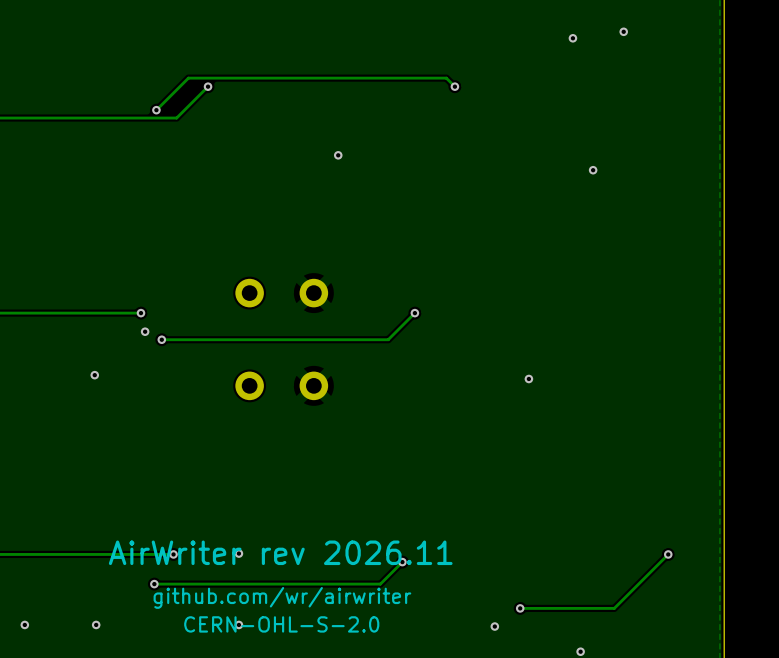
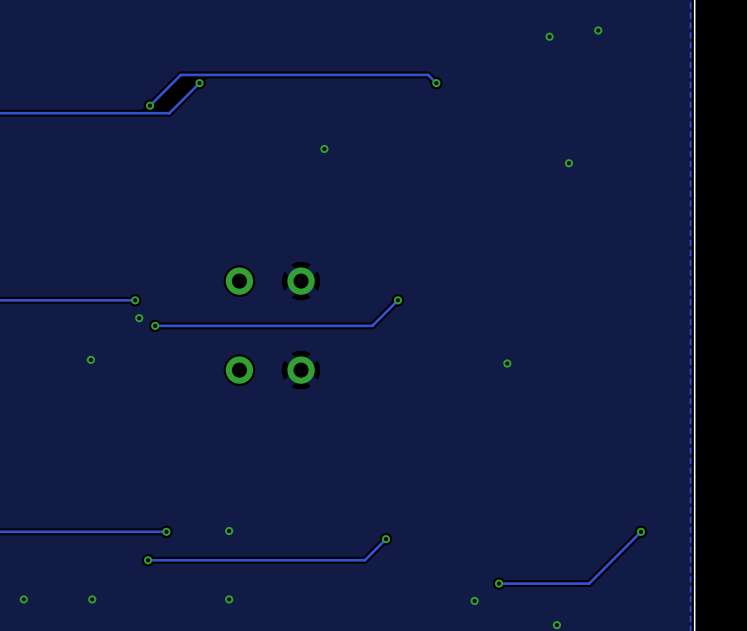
text: AirWriter rev 2026.11 (280, 552) -> none
text: github.com/wr/airwriter (282, 597) -> none
text: CERN-OHL-S-2.0 (281, 624) -> none

